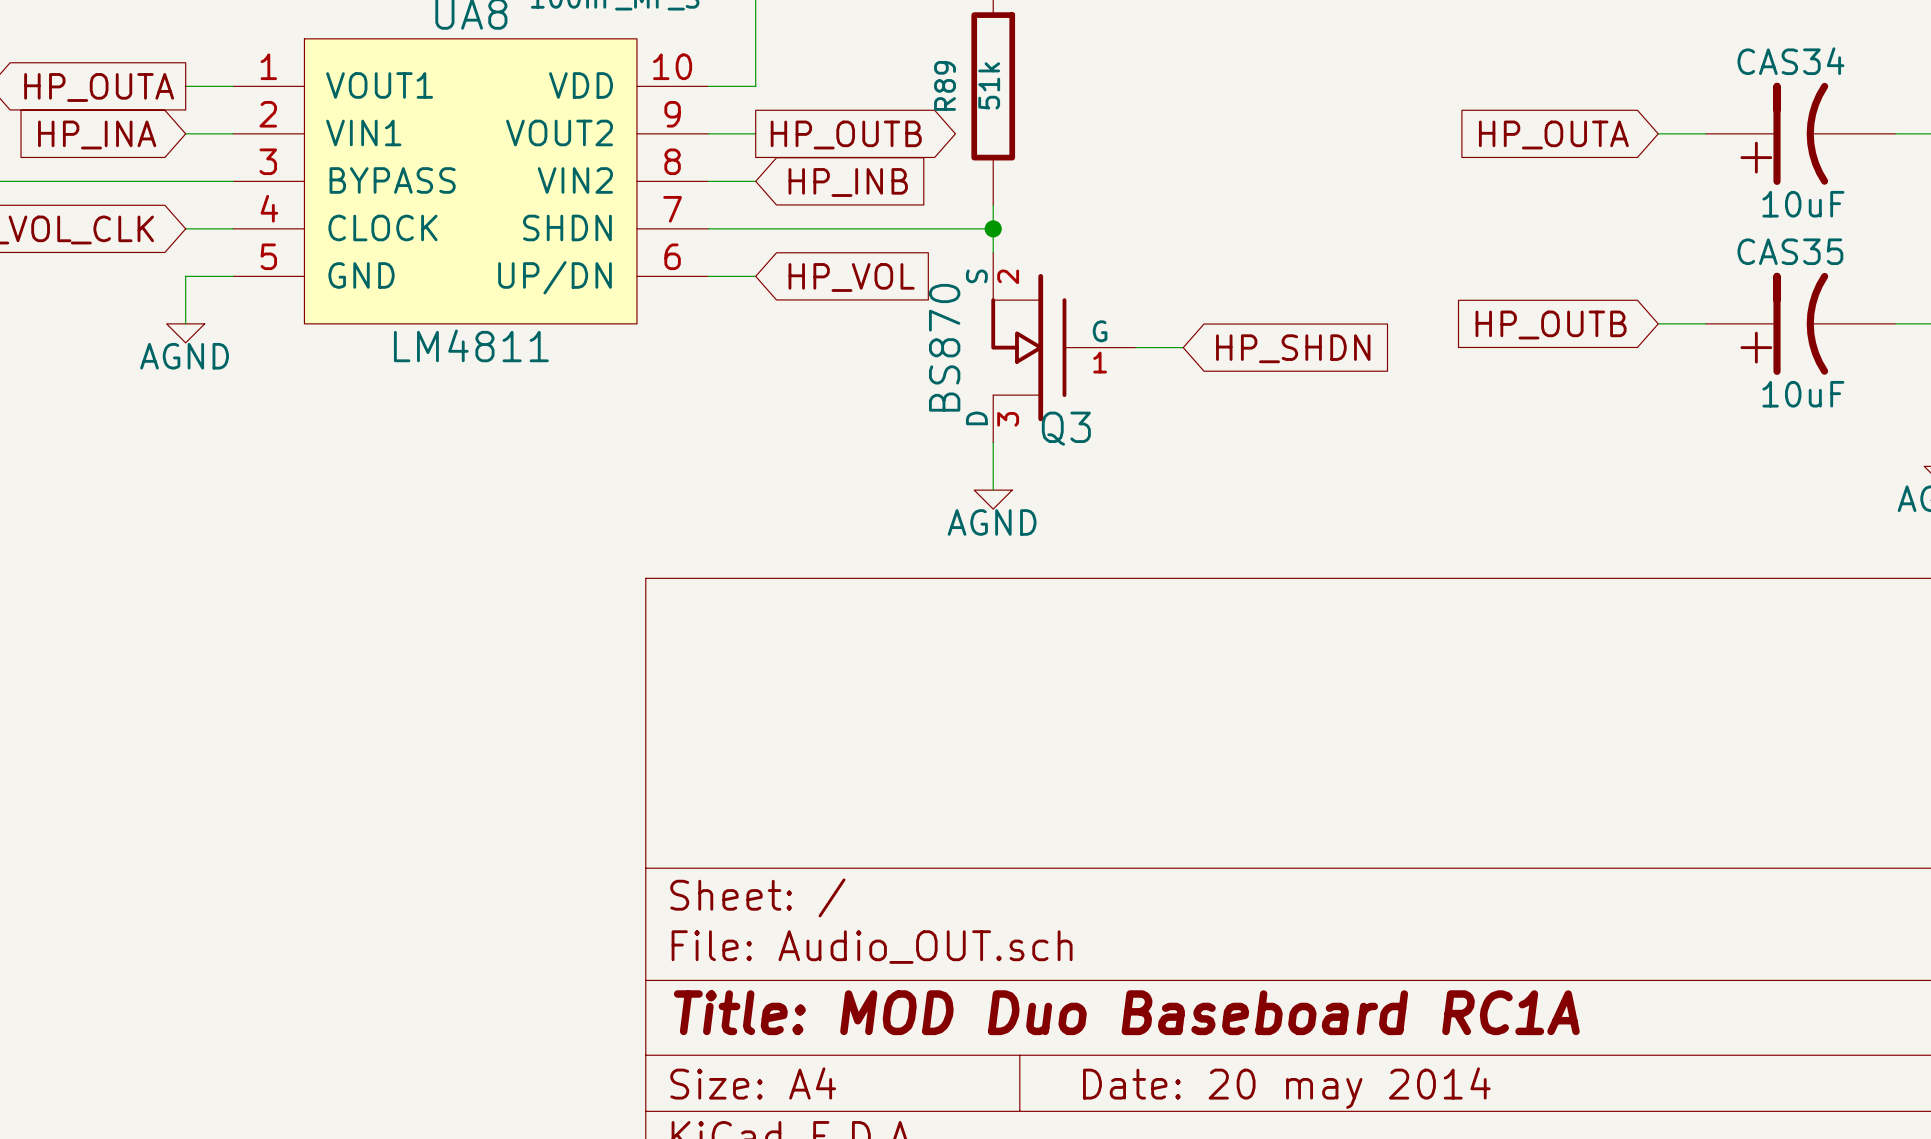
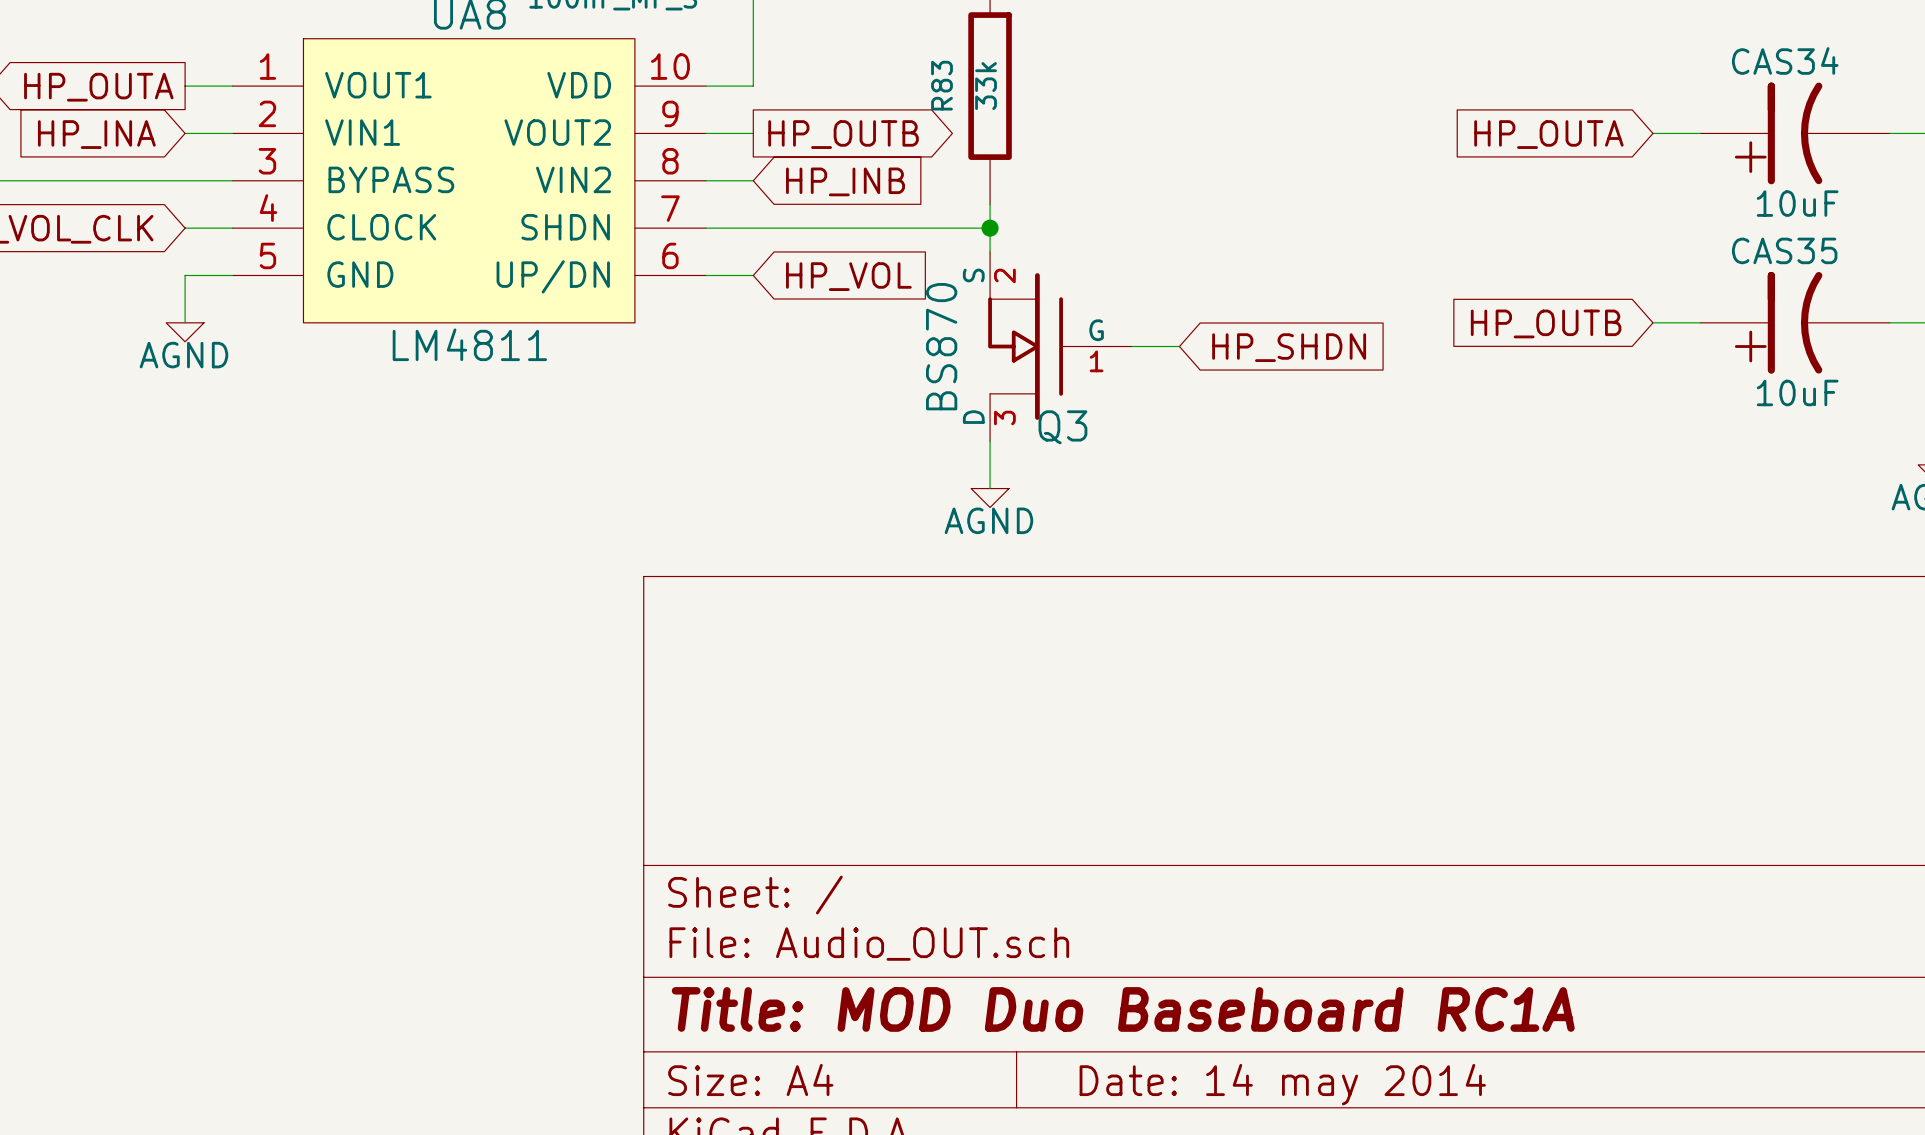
R89 name: R89 (945, 85) -> R83 (941, 85)
R89 value: 51k (989, 85) -> 33k (986, 86)
title block: Date: 20 may 2014 (1286, 1088) -> Date: 14 may 2014 (1282, 1084)

